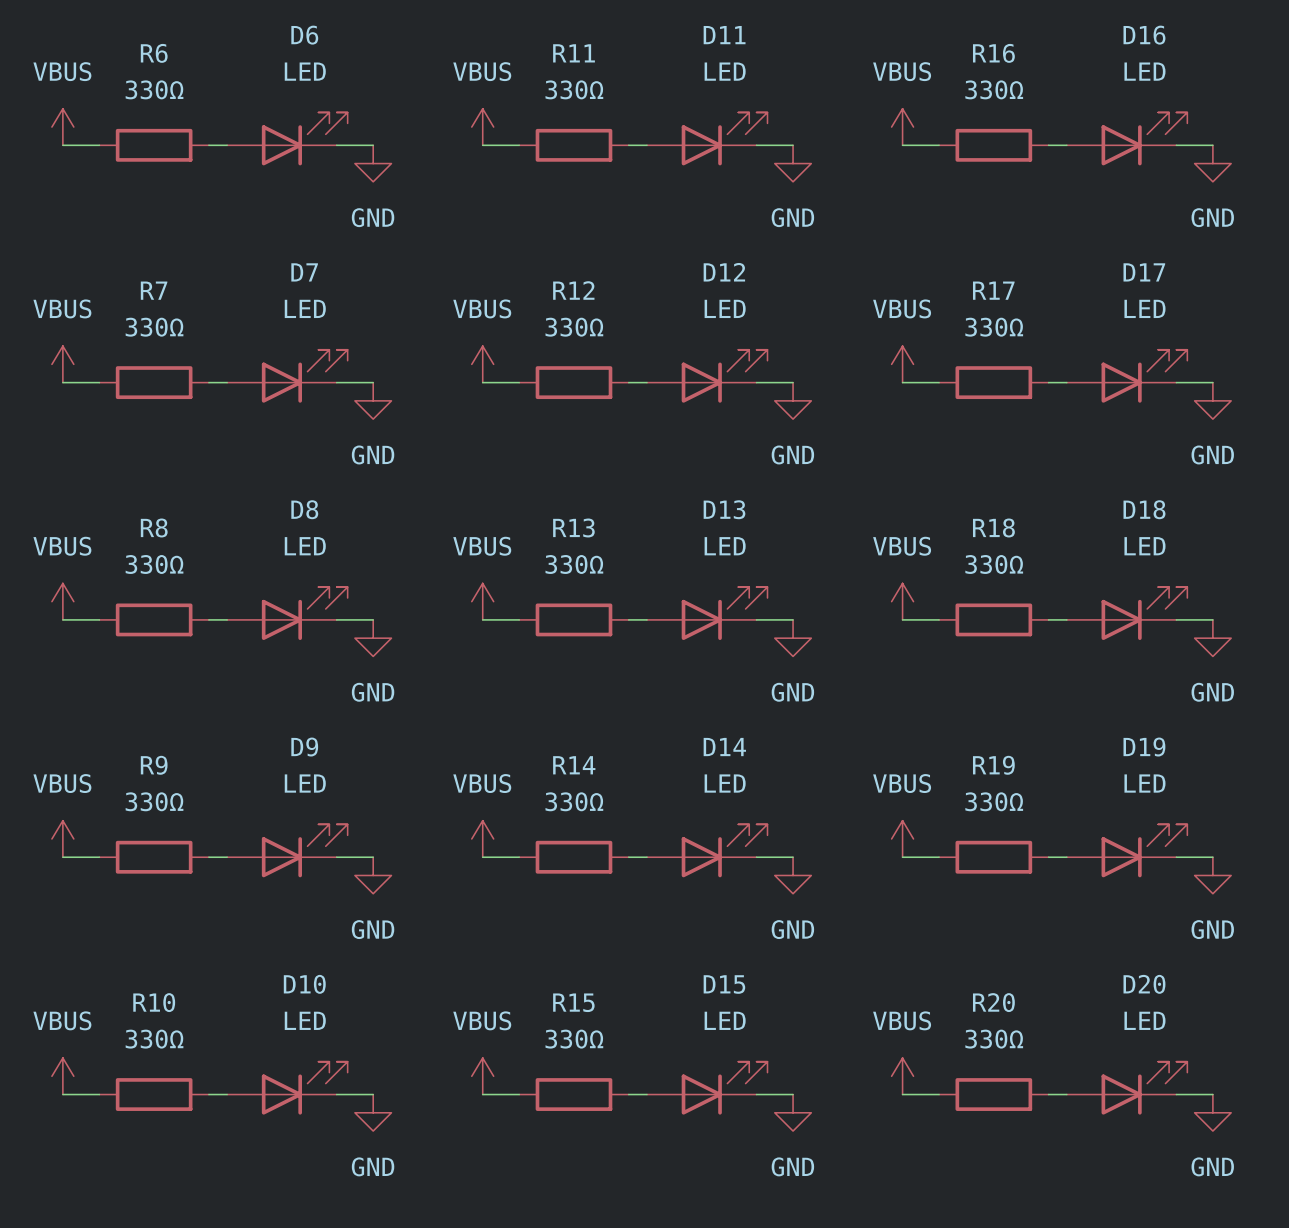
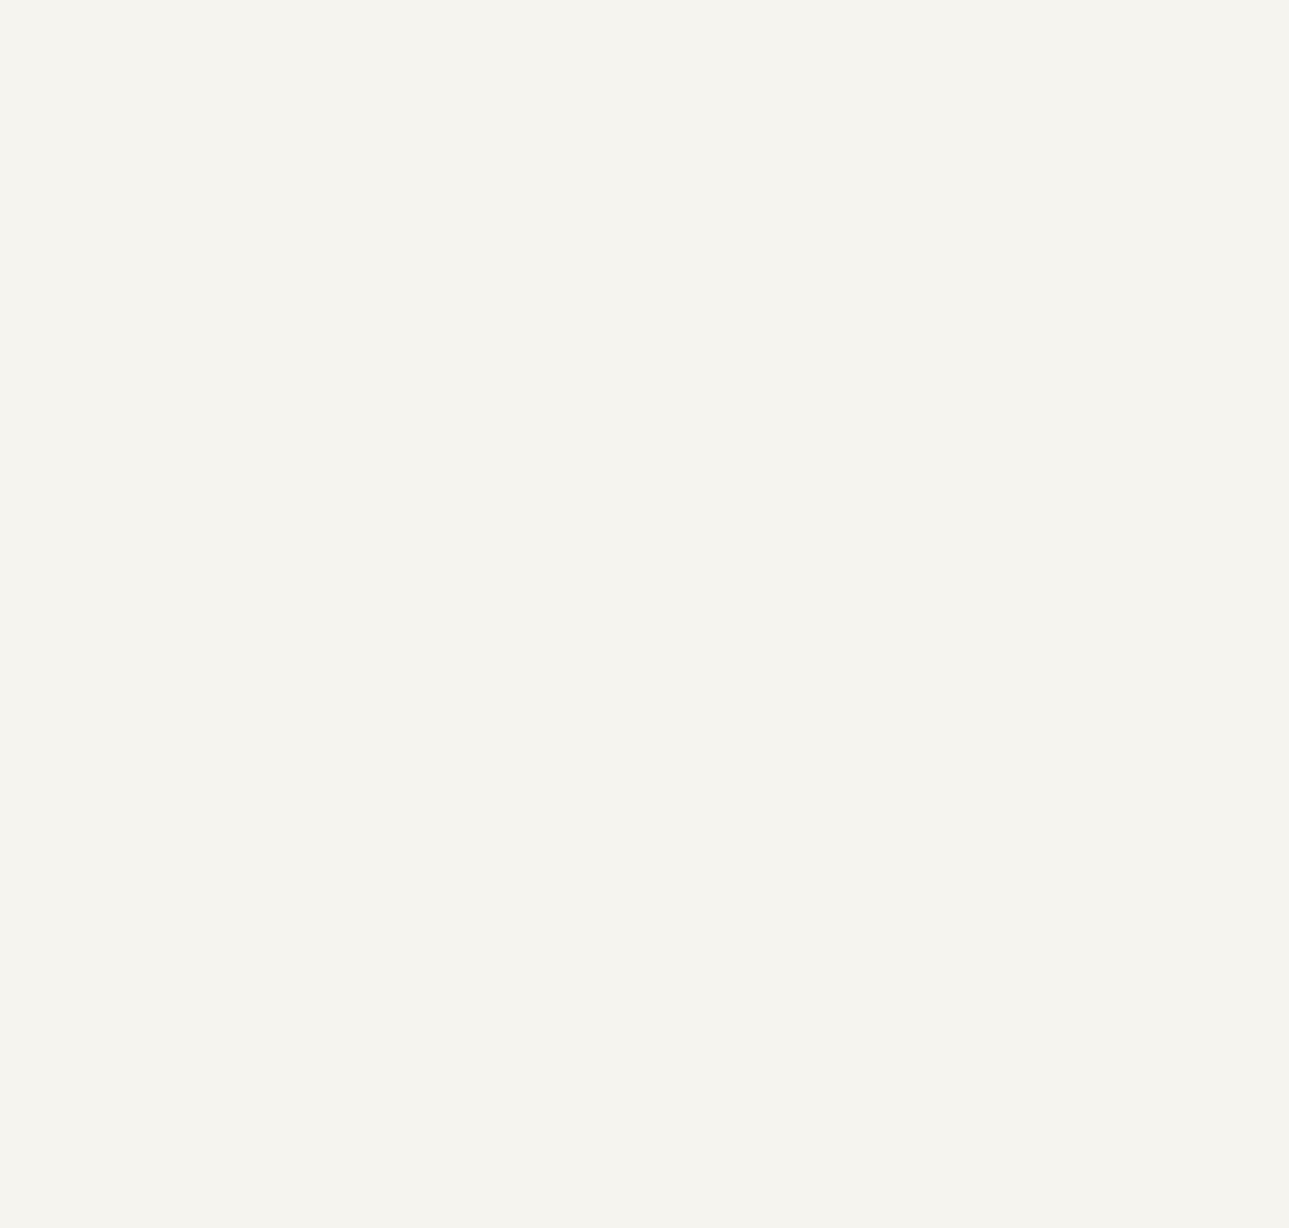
power symbol: VBUS (62, 127) -> none
power symbol: VBUS (482, 127) -> none
power symbol: VBUS (902, 127) -> none
D6: LED (287, 138) -> none
D11: LED (707, 138) -> none
D16: LED (1127, 138) -> none
wire: (62, 145) (99, 145) -> none
R6: 330Ω (154, 145) -> none
wire: (208, 145) (227, 145) -> none
wire: (336, 145) (373, 145) -> none
wire: (482, 145) (519, 145) -> none
R11: 330Ω (573, 145) -> none
wire: (628, 145) (647, 145) -> none
wire: (756, 145) (793, 145) -> none
wire: (902, 145) (939, 145) -> none
R16: 330Ω (993, 145) -> none
wire: (1048, 145) (1066, 145) -> none
wire: (1176, 145) (1212, 145) -> none
power symbol: GND (373, 163) -> none
power symbol: GND (793, 163) -> none
power symbol: GND (1212, 163) -> none
power symbol: VBUS (62, 364) -> none
power symbol: VBUS (482, 364) -> none
power symbol: VBUS (902, 364) -> none
D7: LED (287, 376) -> none
D12: LED (707, 376) -> none
D17: LED (1127, 376) -> none
wire: (62, 382) (99, 382) -> none
R7: 330Ω (154, 382) -> none
wire: (208, 382) (227, 382) -> none
wire: (336, 382) (373, 382) -> none
wire: (482, 382) (519, 382) -> none
R12: 330Ω (573, 382) -> none
wire: (628, 382) (647, 382) -> none
wire: (756, 382) (793, 382) -> none
wire: (902, 382) (939, 382) -> none
R17: 330Ω (993, 382) -> none
wire: (1048, 382) (1066, 382) -> none
wire: (1176, 382) (1212, 382) -> none
power symbol: GND (373, 400) -> none
power symbol: GND (793, 400) -> none
power symbol: GND (1212, 400) -> none
power symbol: VBUS (62, 601) -> none
power symbol: VBUS (482, 601) -> none
power symbol: VBUS (902, 601) -> none
D8: LED (287, 613) -> none
D13: LED (707, 613) -> none
D18: LED (1127, 613) -> none
wire: (62, 619) (99, 619) -> none
R8: 330Ω (154, 619) -> none
wire: (208, 619) (227, 619) -> none
wire: (336, 619) (373, 619) -> none
wire: (482, 619) (519, 619) -> none
R13: 330Ω (573, 619) -> none
wire: (628, 619) (647, 619) -> none
wire: (756, 619) (793, 619) -> none
wire: (902, 619) (939, 619) -> none
R18: 330Ω (993, 619) -> none
wire: (1048, 619) (1066, 619) -> none
wire: (1176, 619) (1212, 619) -> none
power symbol: GND (373, 638) -> none
power symbol: GND (793, 638) -> none
power symbol: GND (1212, 638) -> none
power symbol: VBUS (62, 838) -> none
power symbol: VBUS (482, 838) -> none
power symbol: VBUS (902, 838) -> none
D9: LED (287, 850) -> none
D14: LED (707, 850) -> none
D19: LED (1127, 850) -> none
wire: (62, 857) (99, 857) -> none
R9: 330Ω (154, 857) -> none
wire: (208, 857) (227, 857) -> none
wire: (336, 857) (373, 857) -> none
wire: (482, 857) (519, 857) -> none
R14: 330Ω (573, 857) -> none
wire: (628, 857) (647, 857) -> none
wire: (756, 857) (793, 857) -> none
wire: (902, 857) (939, 857) -> none
R19: 330Ω (993, 857) -> none
wire: (1048, 857) (1066, 857) -> none
wire: (1176, 857) (1212, 857) -> none
power symbol: GND (373, 875) -> none
power symbol: GND (793, 875) -> none
power symbol: GND (1212, 875) -> none
power symbol: VBUS (62, 1076) -> none
power symbol: VBUS (482, 1076) -> none
power symbol: VBUS (902, 1076) -> none
D10: LED (287, 1088) -> none
D15: LED (707, 1088) -> none
D20: LED (1127, 1088) -> none
wire: (62, 1094) (99, 1094) -> none
R10: 330Ω (154, 1094) -> none
wire: (208, 1094) (227, 1094) -> none
wire: (336, 1094) (373, 1094) -> none
wire: (482, 1094) (519, 1094) -> none
R15: 330Ω (573, 1094) -> none
wire: (628, 1094) (647, 1094) -> none
wire: (756, 1094) (793, 1094) -> none
wire: (902, 1094) (939, 1094) -> none
R20: 330Ω (993, 1094) -> none
wire: (1048, 1094) (1066, 1094) -> none
wire: (1176, 1094) (1212, 1094) -> none
power symbol: GND (373, 1112) -> none
power symbol: GND (793, 1112) -> none
power symbol: GND (1212, 1112) -> none

